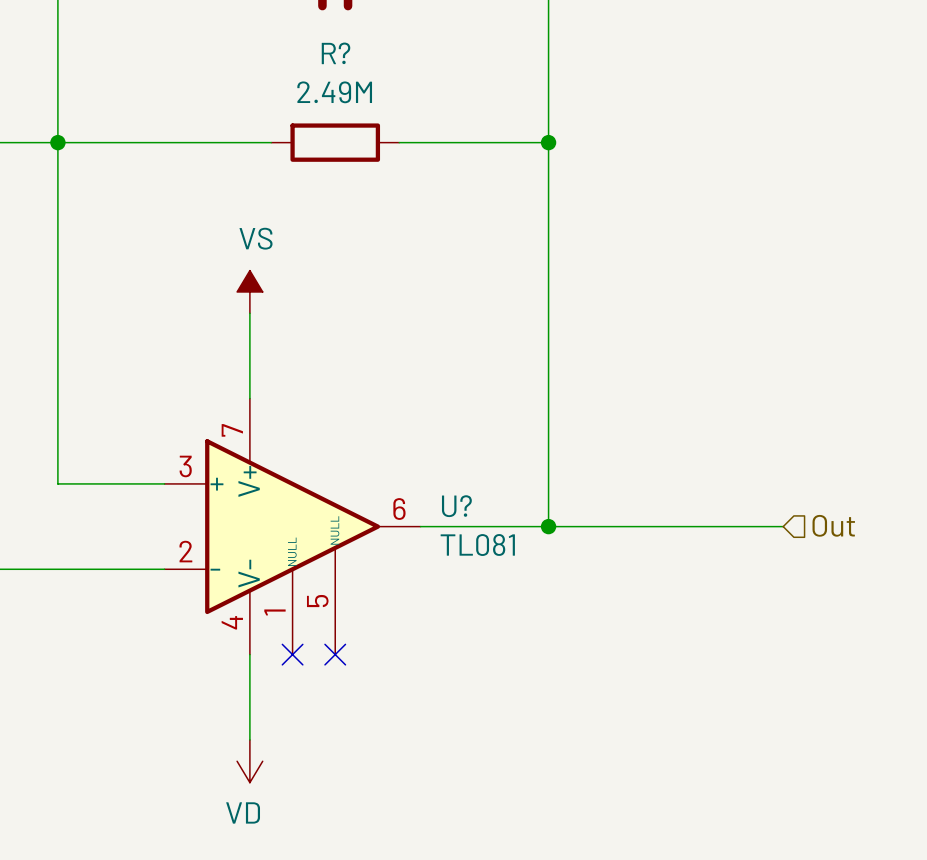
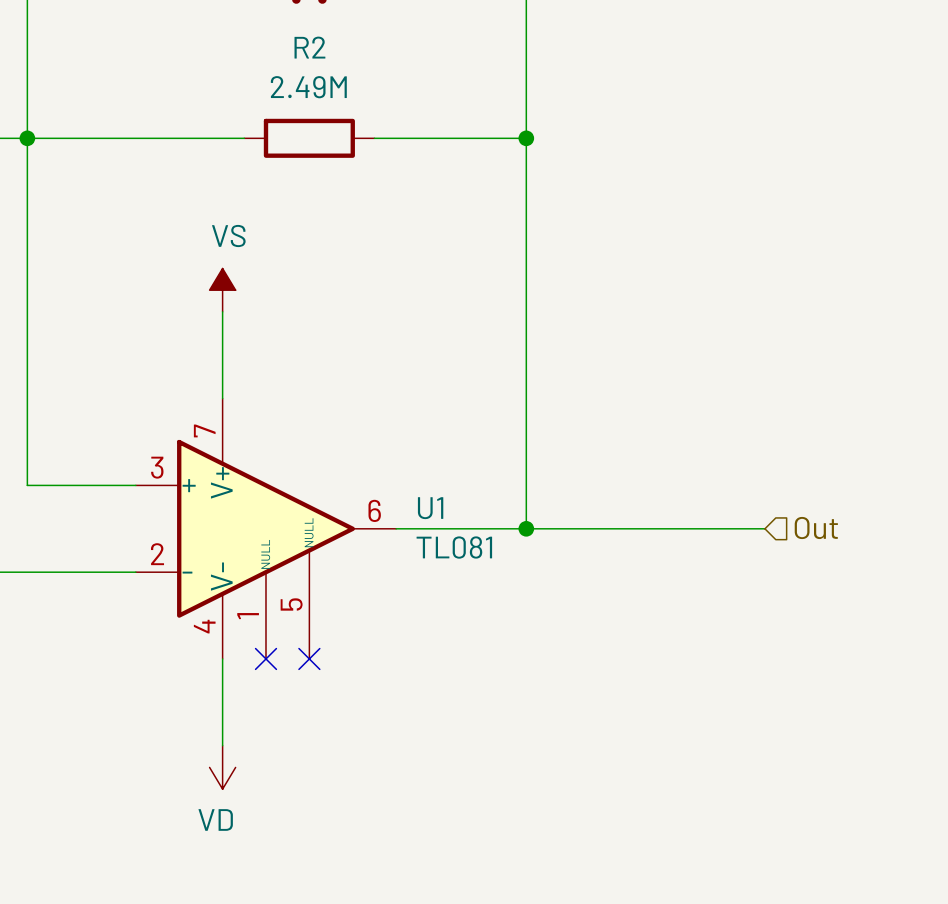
R? name: R? (336, 53) -> R2 (309, 47)
U? name: U? (456, 506) -> U1 (430, 508)

